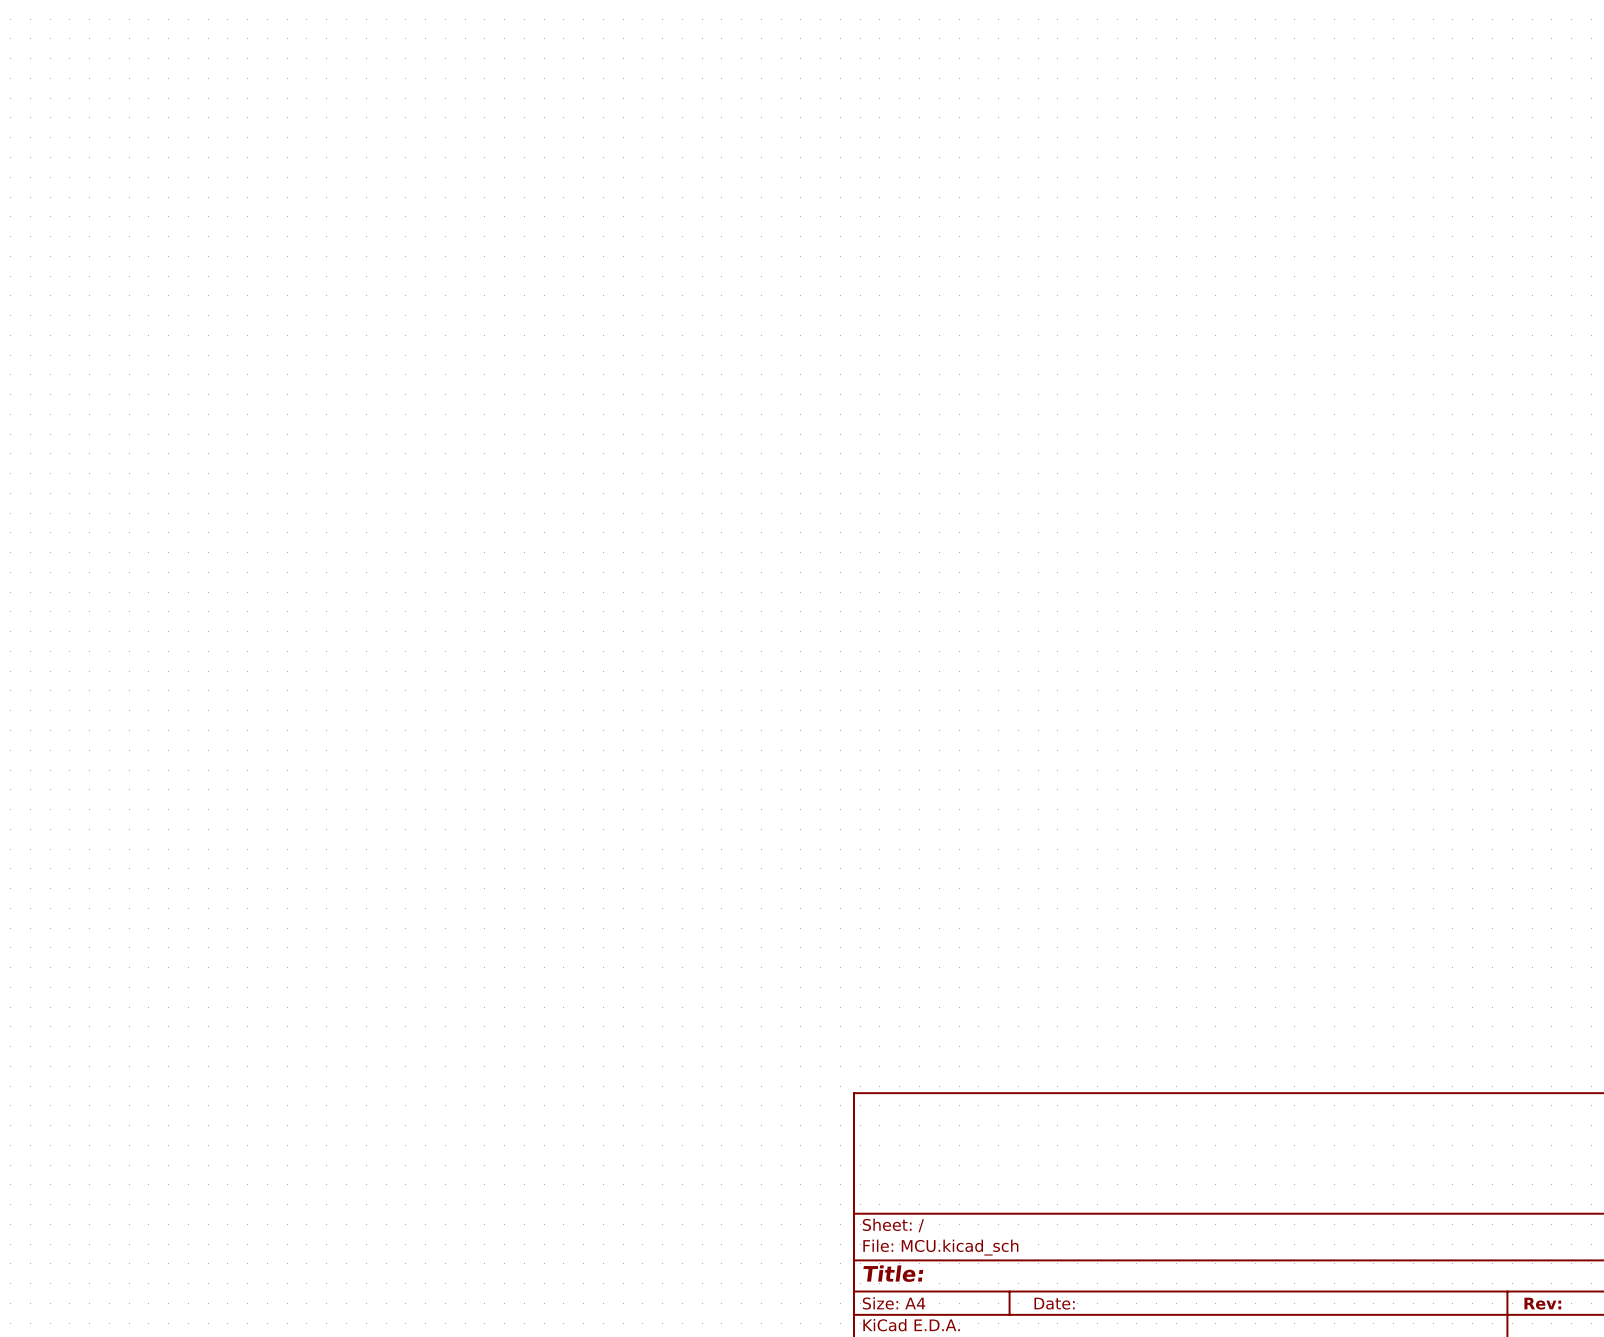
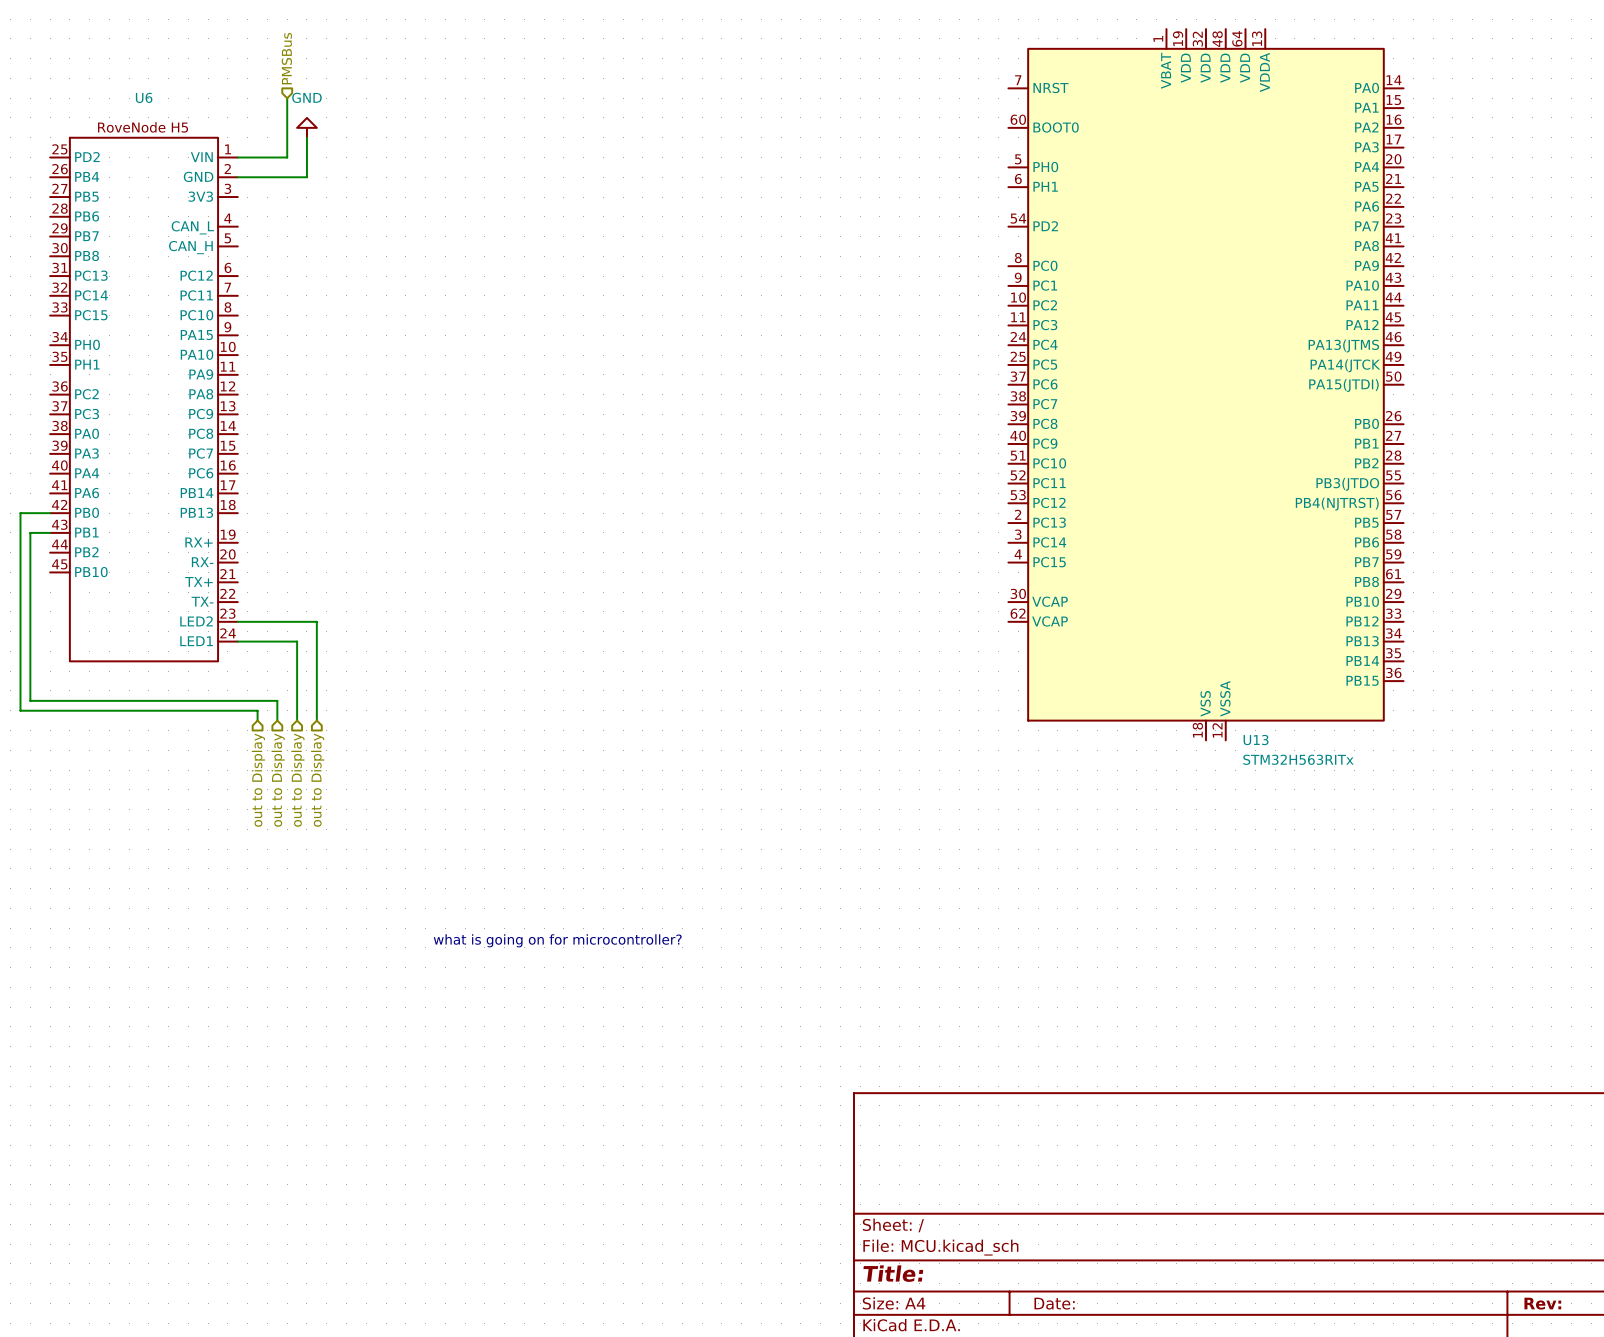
hierarchical label: none -> PMSBus (286, 58)
wire: none -> (287, 98) (287, 157) (237, 157)
power symbol: none -> GND (306, 127)
wire: none -> (306, 137) (306, 177) (237, 177)
U13: none -> STM32H563RITx (1205, 384)
U6: none -> (143, 399)
wire: none -> (50, 513) (20, 513) (20, 710) (257, 710) (257, 720)
wire: none -> (50, 532) (30, 532) (30, 700) (277, 700) (277, 720)
wire: none -> (237, 621) (316, 621) (316, 720)
wire: none -> (237, 641) (297, 641) (297, 720)
hierarchical label: none -> out to Display (258, 780)
hierarchical label: none -> out to Display (278, 780)
hierarchical label: none -> out to Display (297, 780)
hierarchical label: none -> out to Display (317, 780)
text: none -> what is going on for microcontroller? (557, 940)

